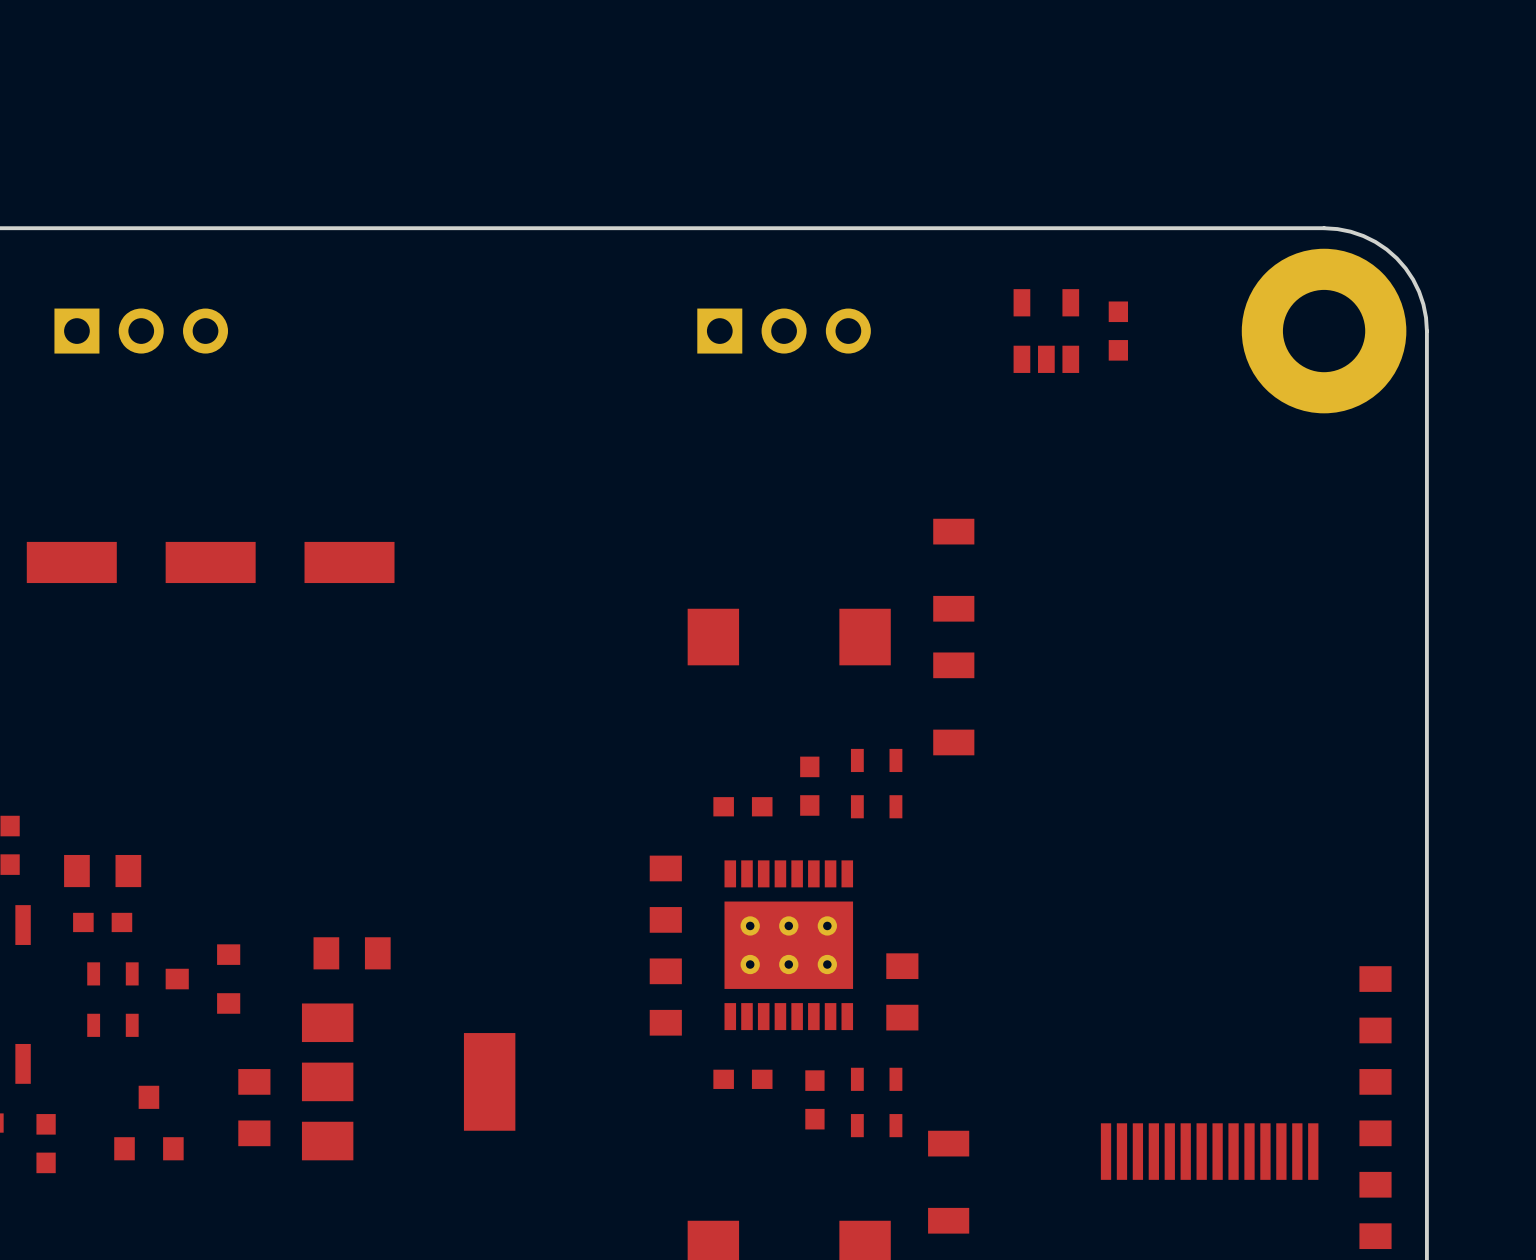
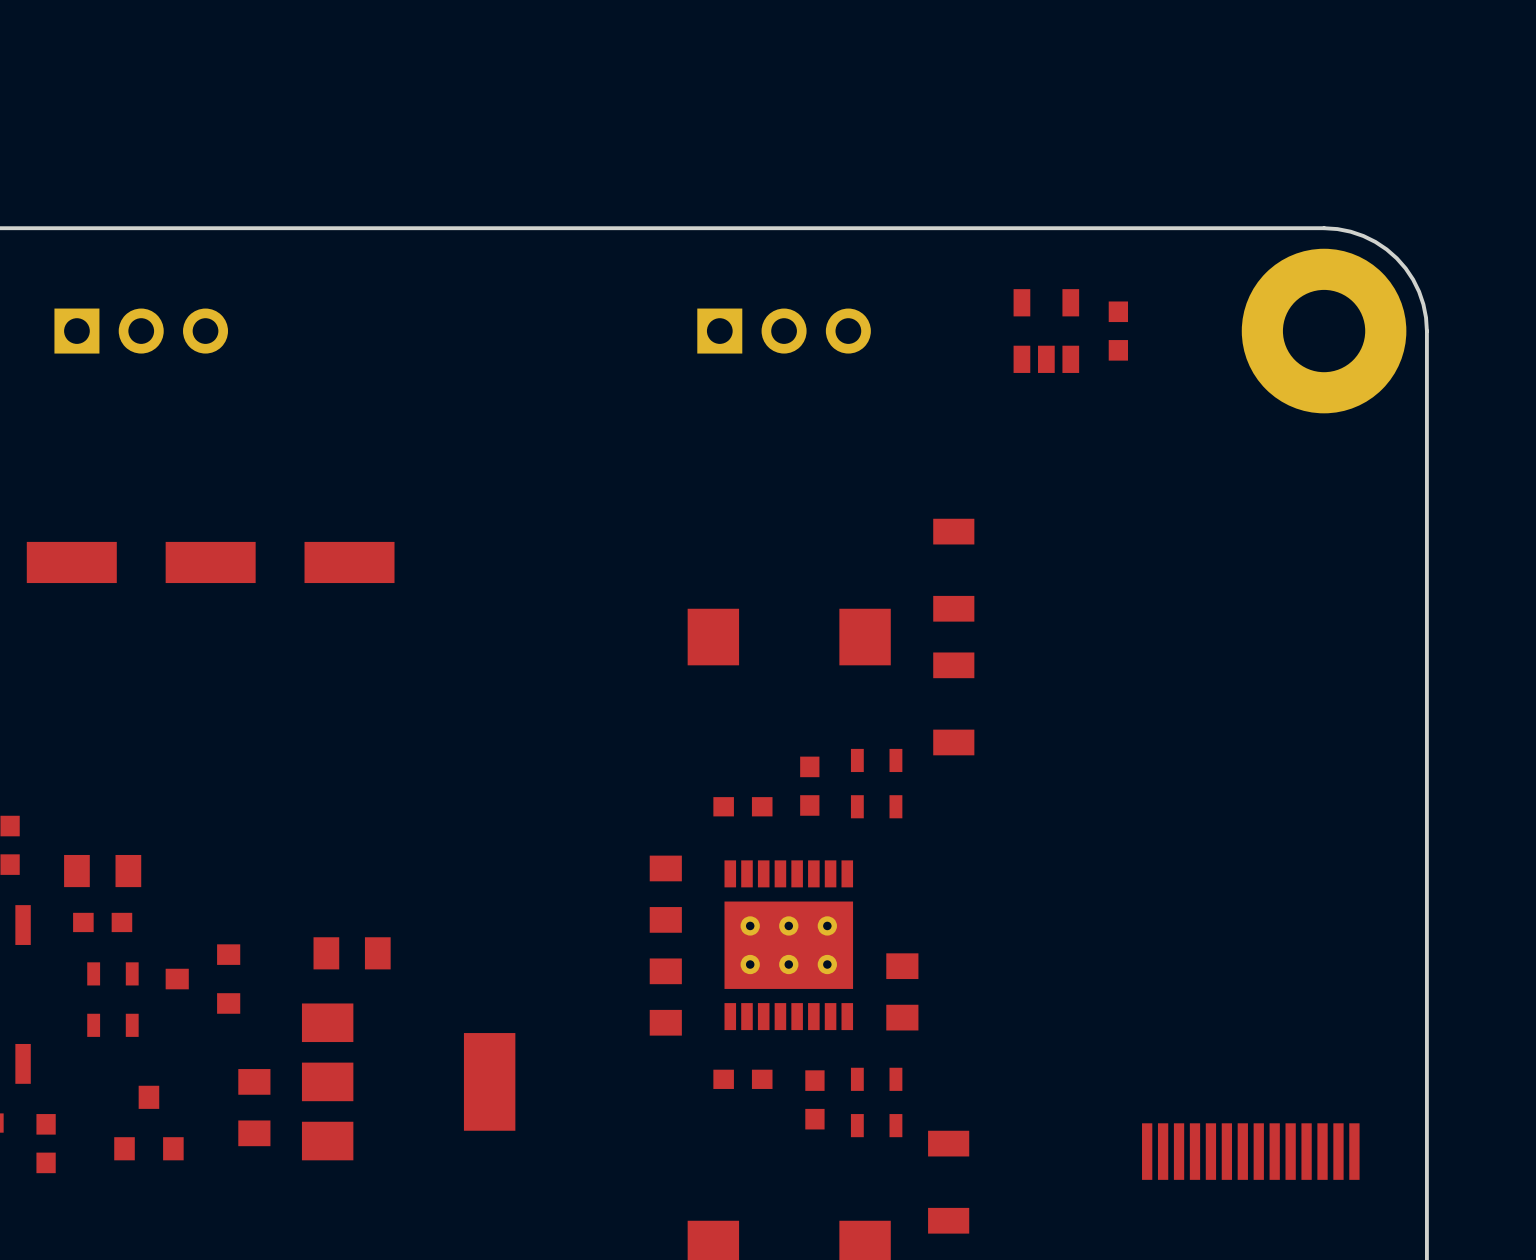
part: (1375, 1004) -> none
part: (1375, 1107) -> none
part position: (1209, 1151) -> (1250, 1151)
part: (1375, 1210) -> none

